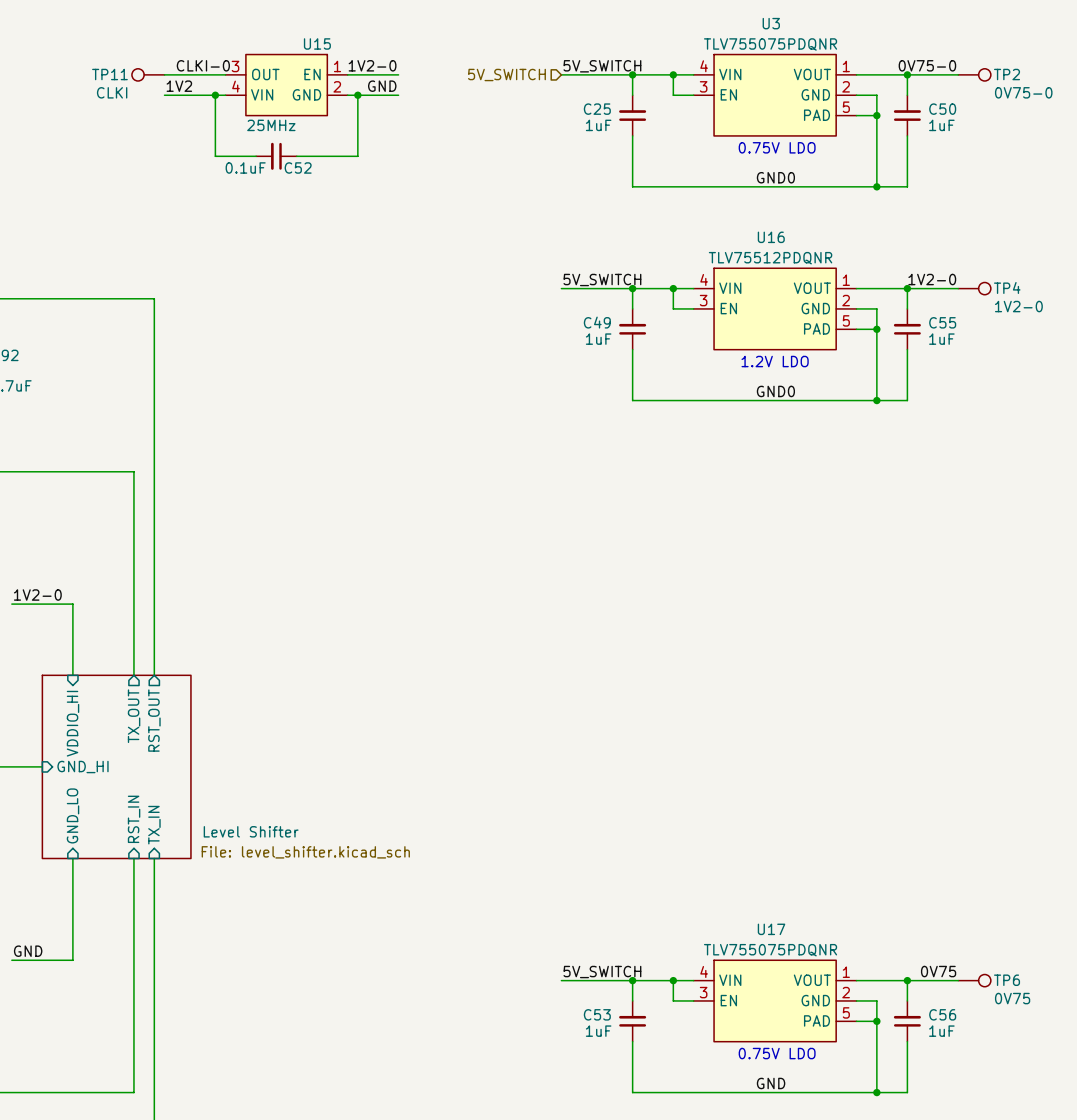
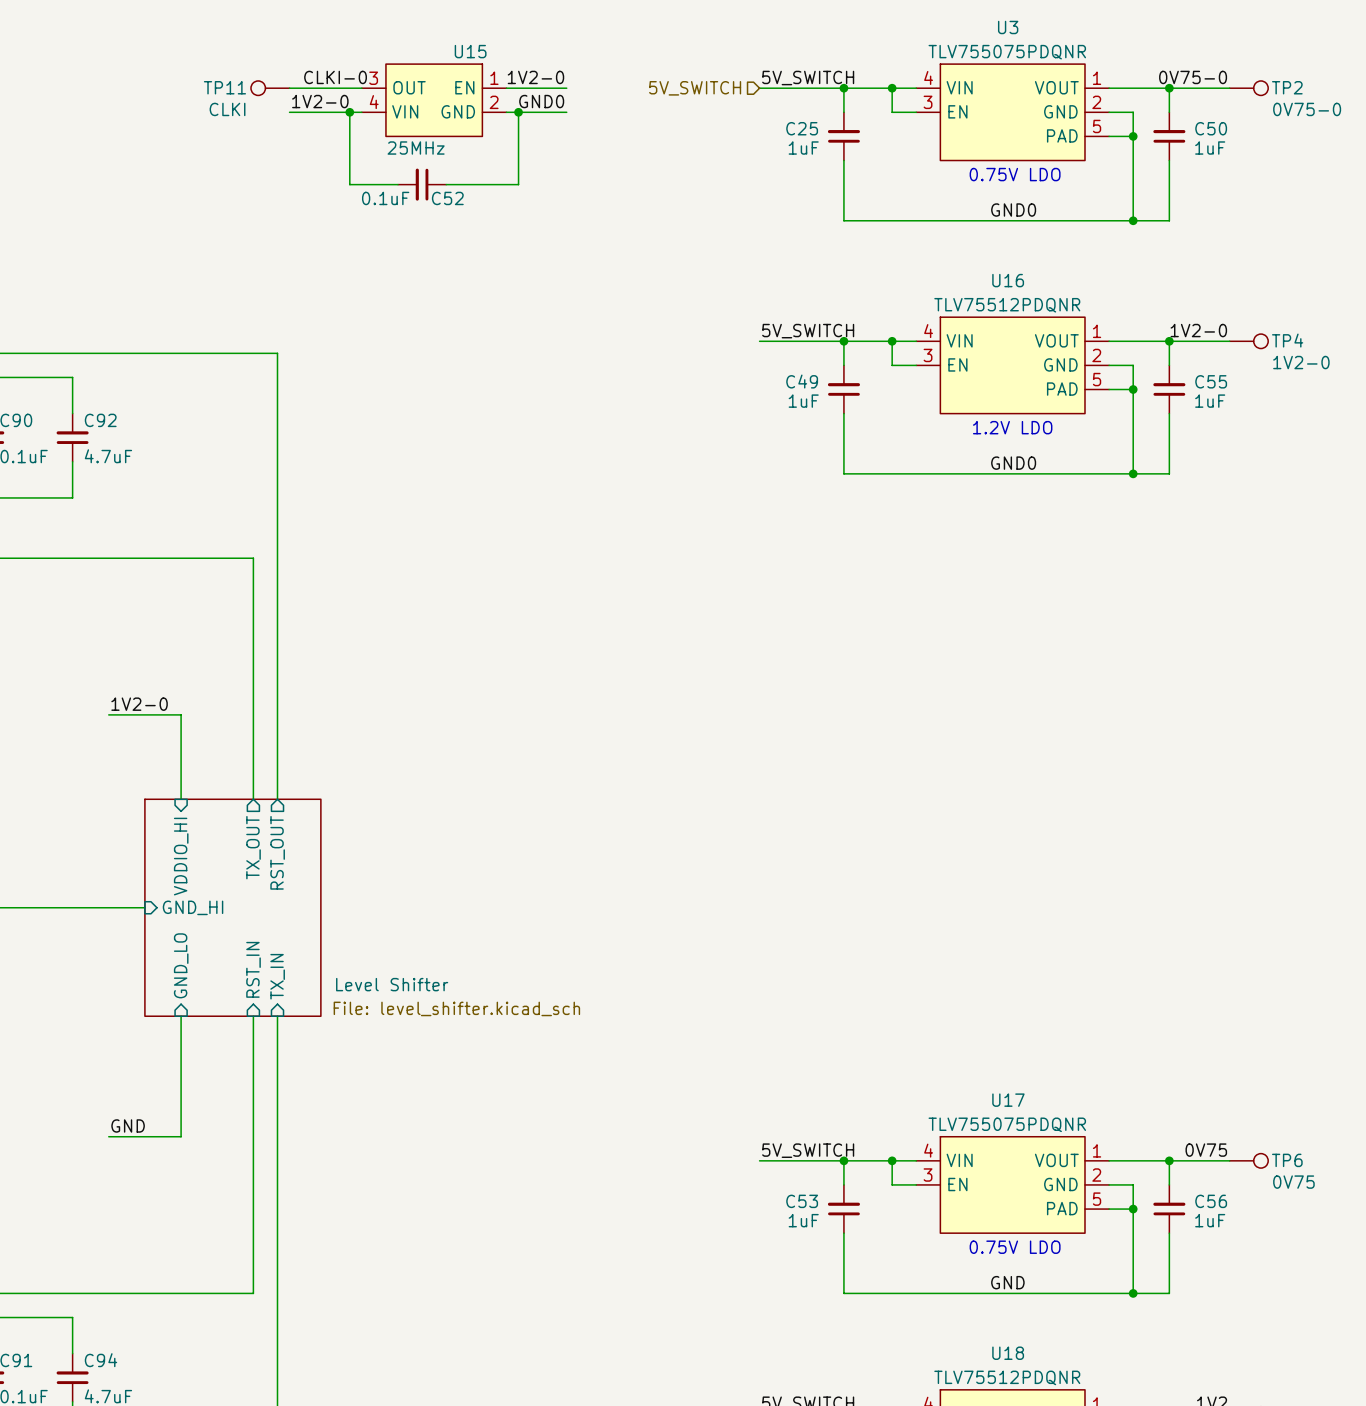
label: 1V2 (179, 86) -> 1V2-0 (320, 101)
label: GND (382, 86) -> GND0 (541, 101)

